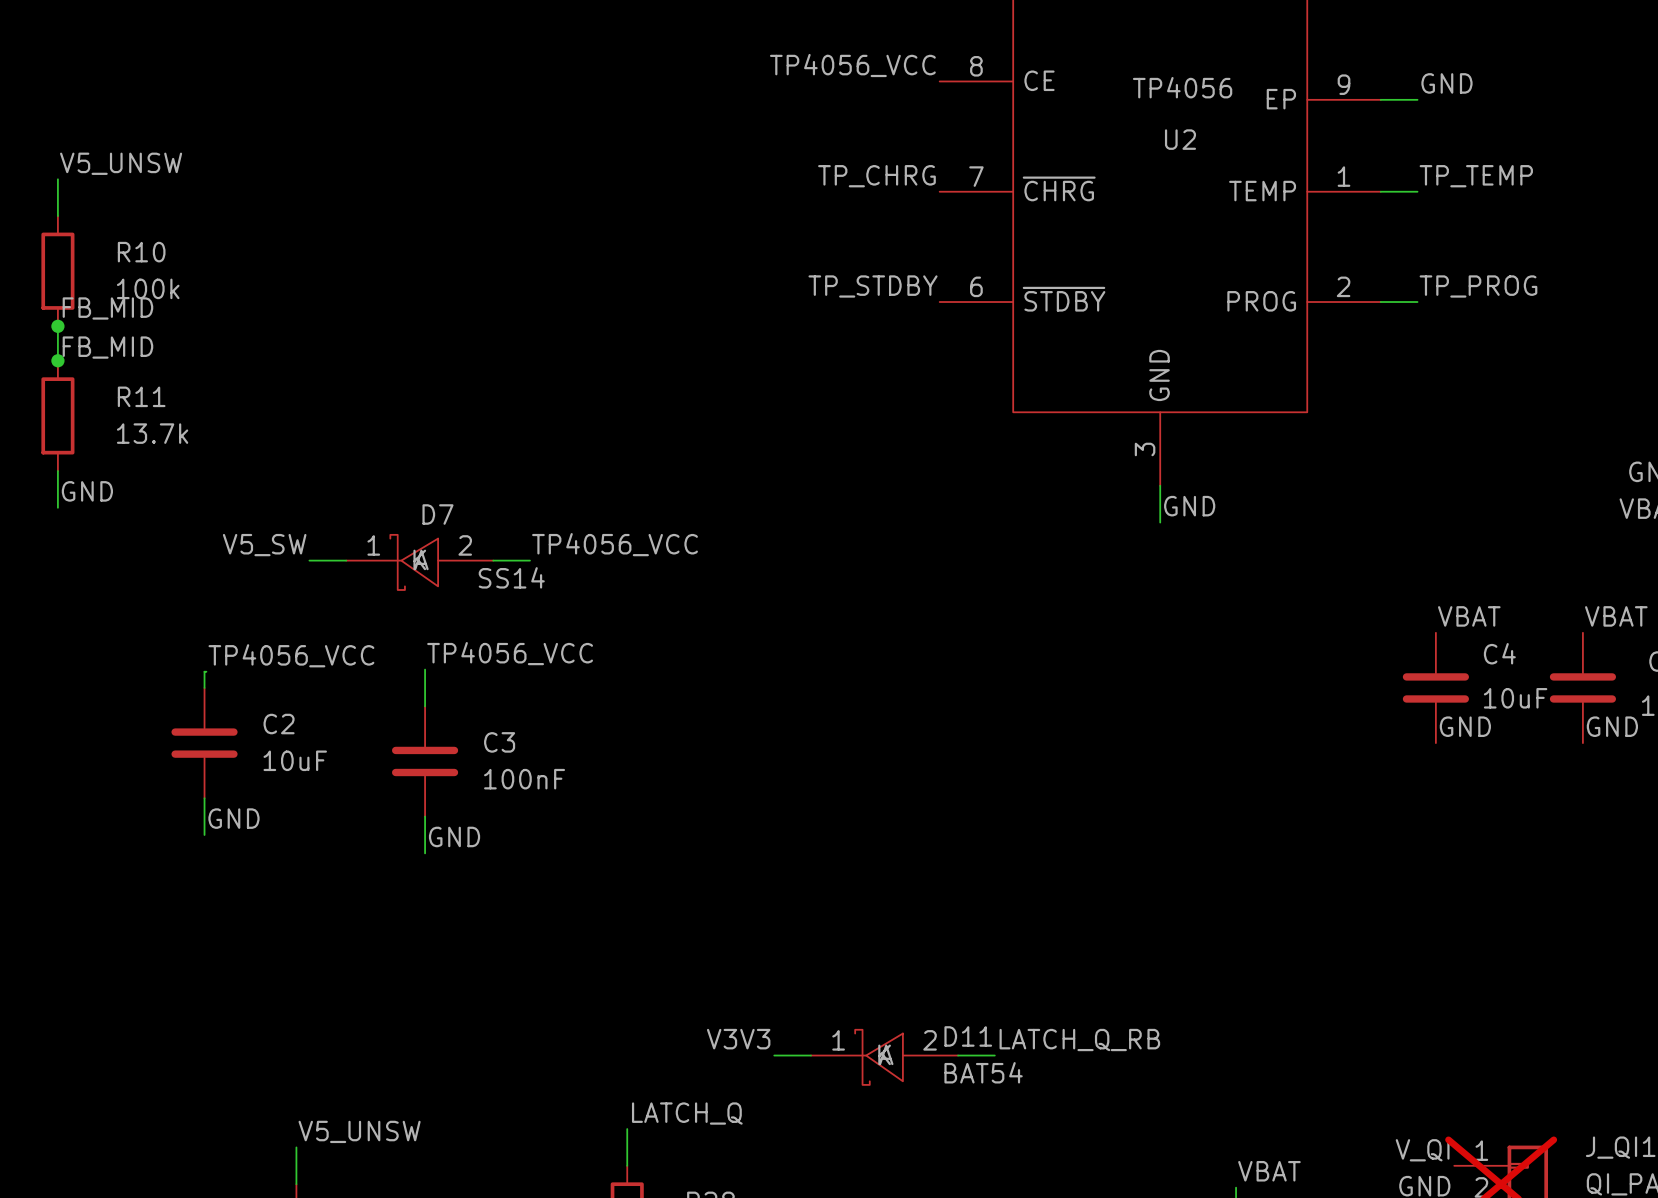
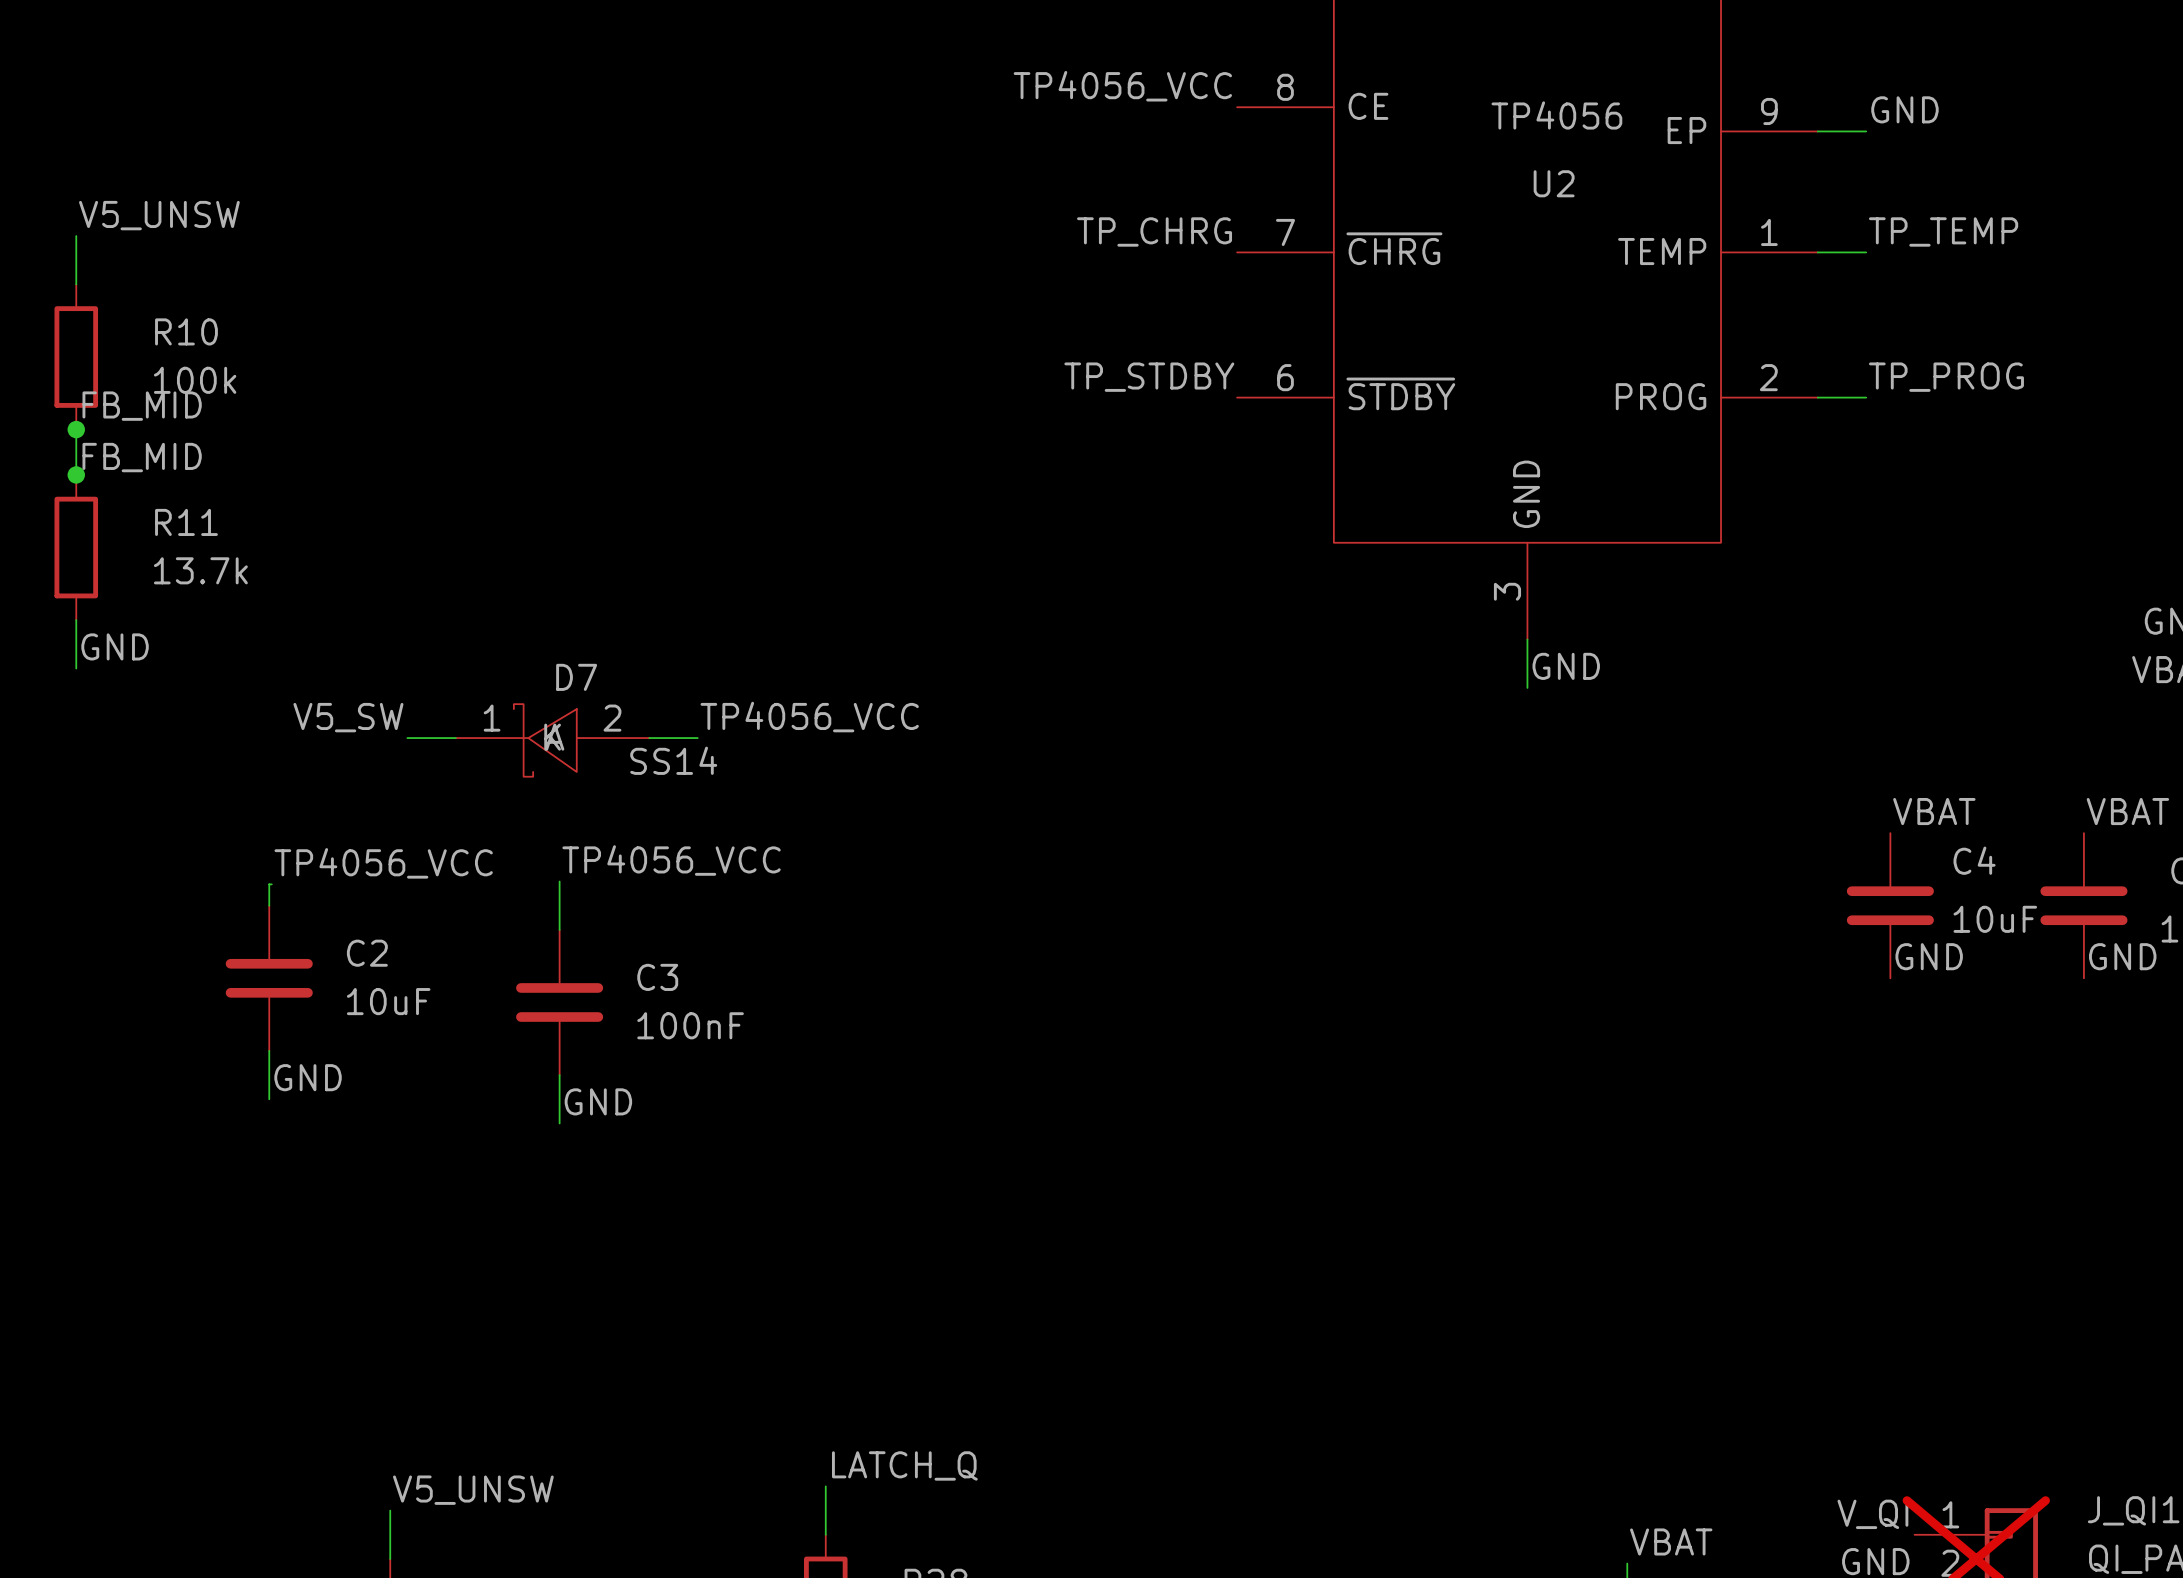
label: V3V3 (738, 1039) -> none
label: LATCH_Q_RB (1079, 1040) -> none
wire: (774, 1055) (811, 1055) -> none
wire: (958, 1055) (994, 1055) -> none
D11: BAT54 (884, 1057) -> none

